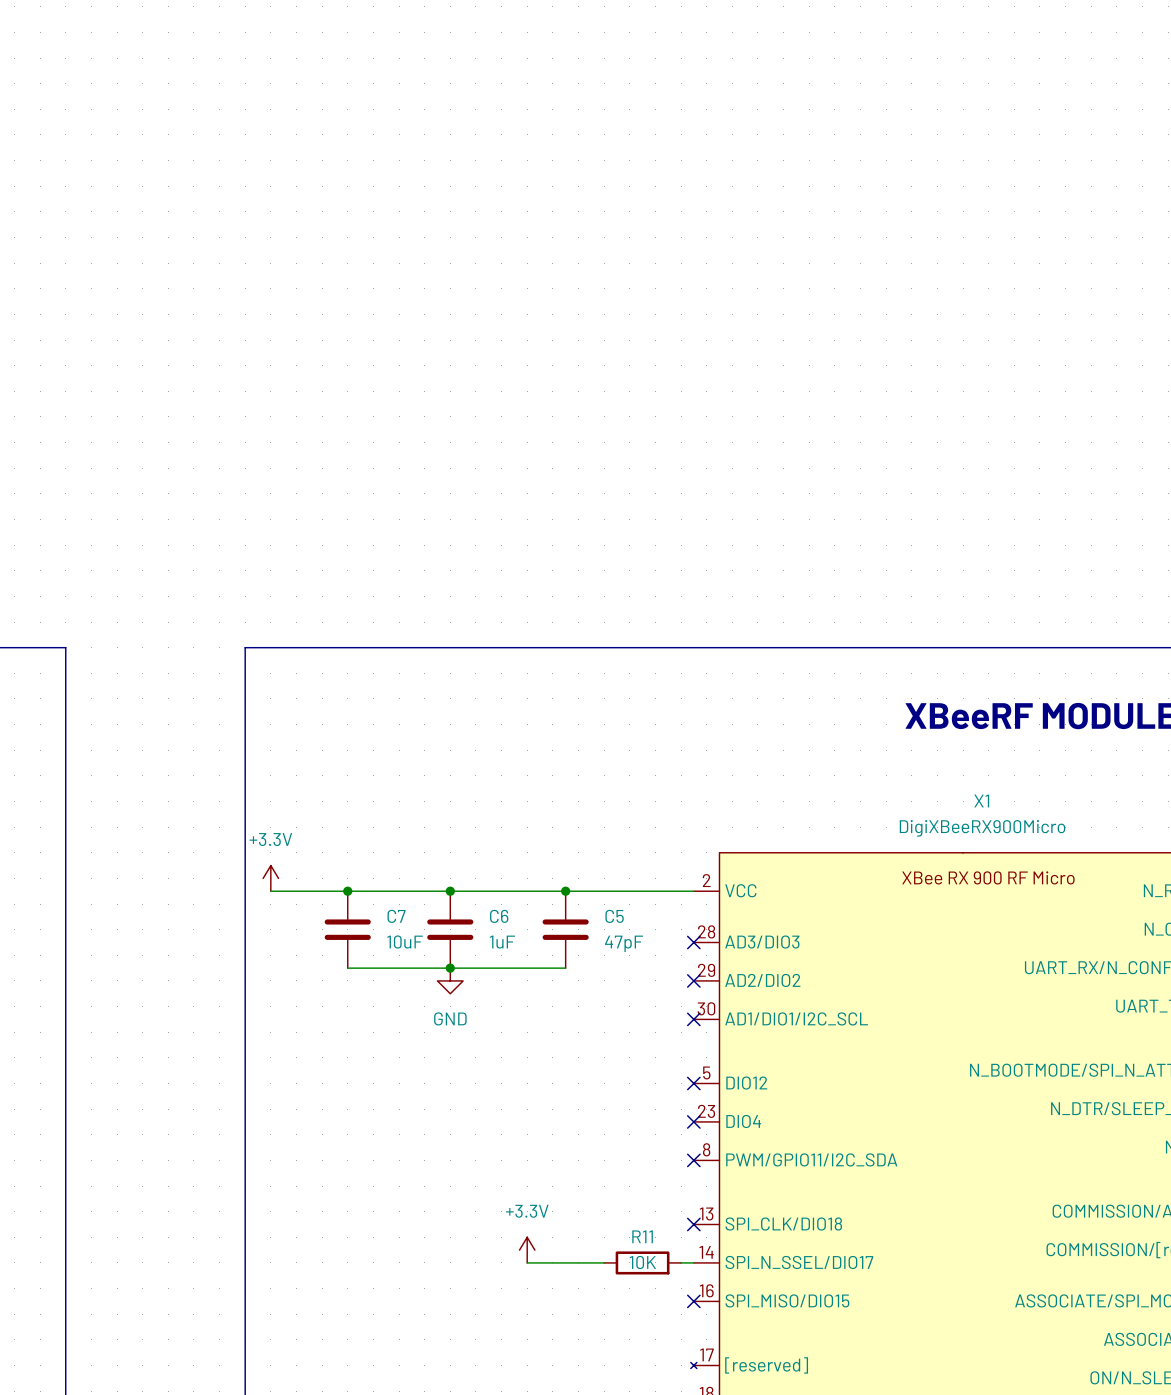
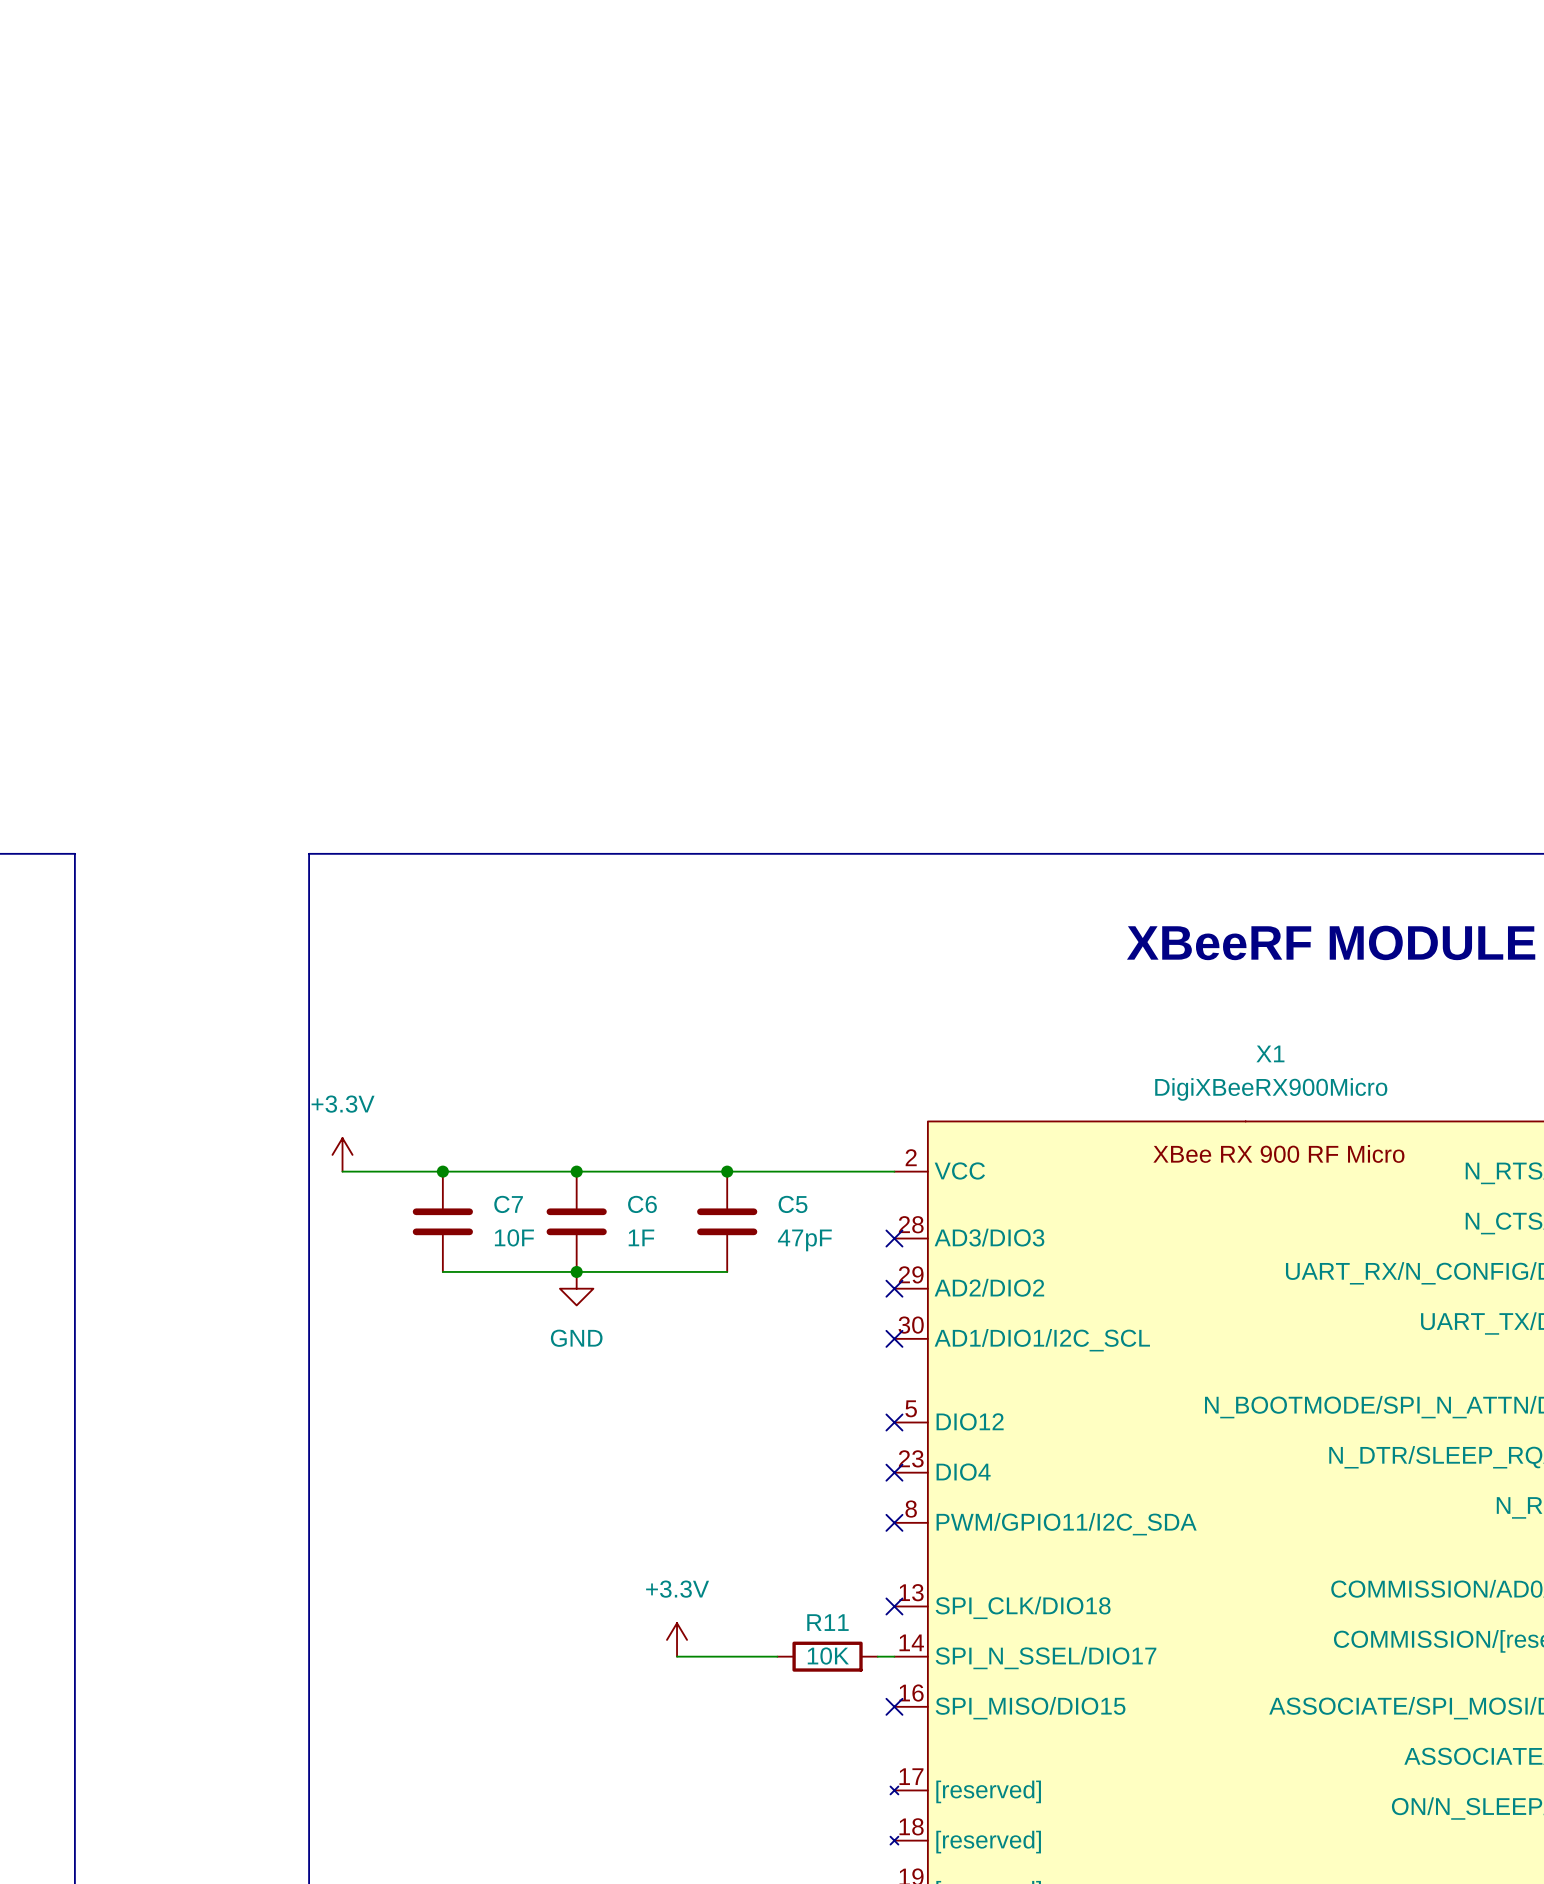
C7 value: 10uF (405, 942) -> 10F (514, 1237)
C6 value: 1uF (502, 942) -> 1F (641, 1237)

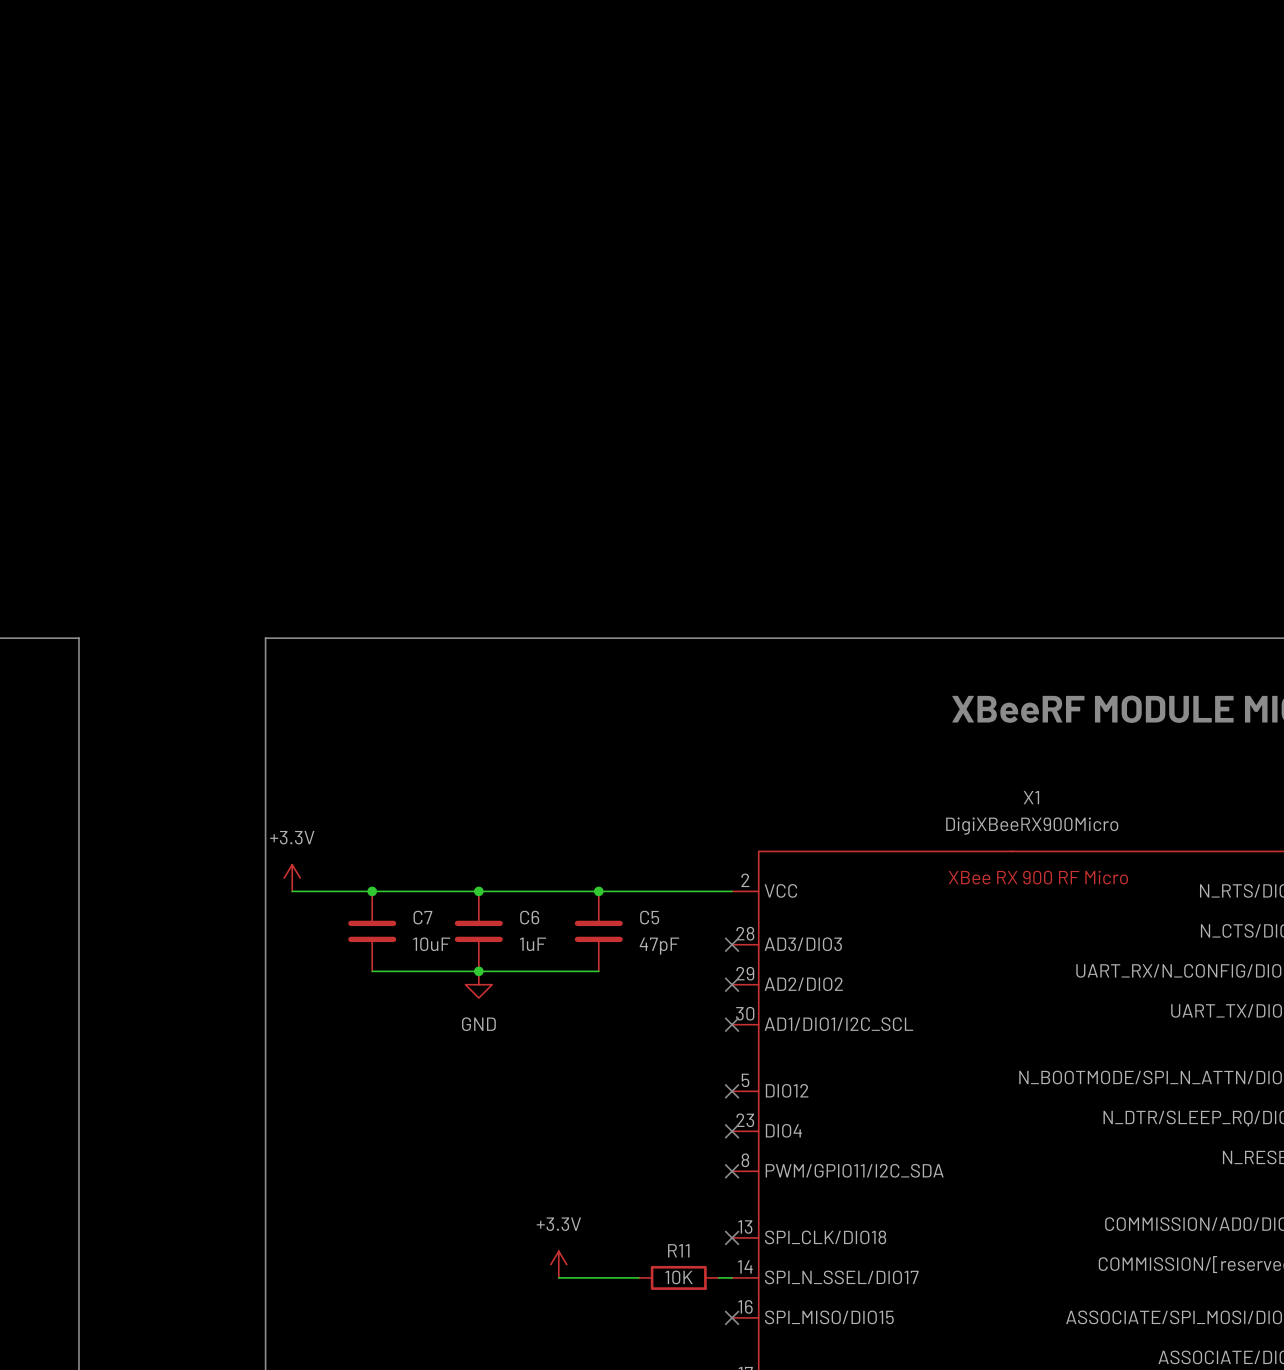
C7 value: 10F (514, 1237) -> 10uF (431, 944)
C6 value: 1F (641, 1237) -> 1uF (533, 944)

